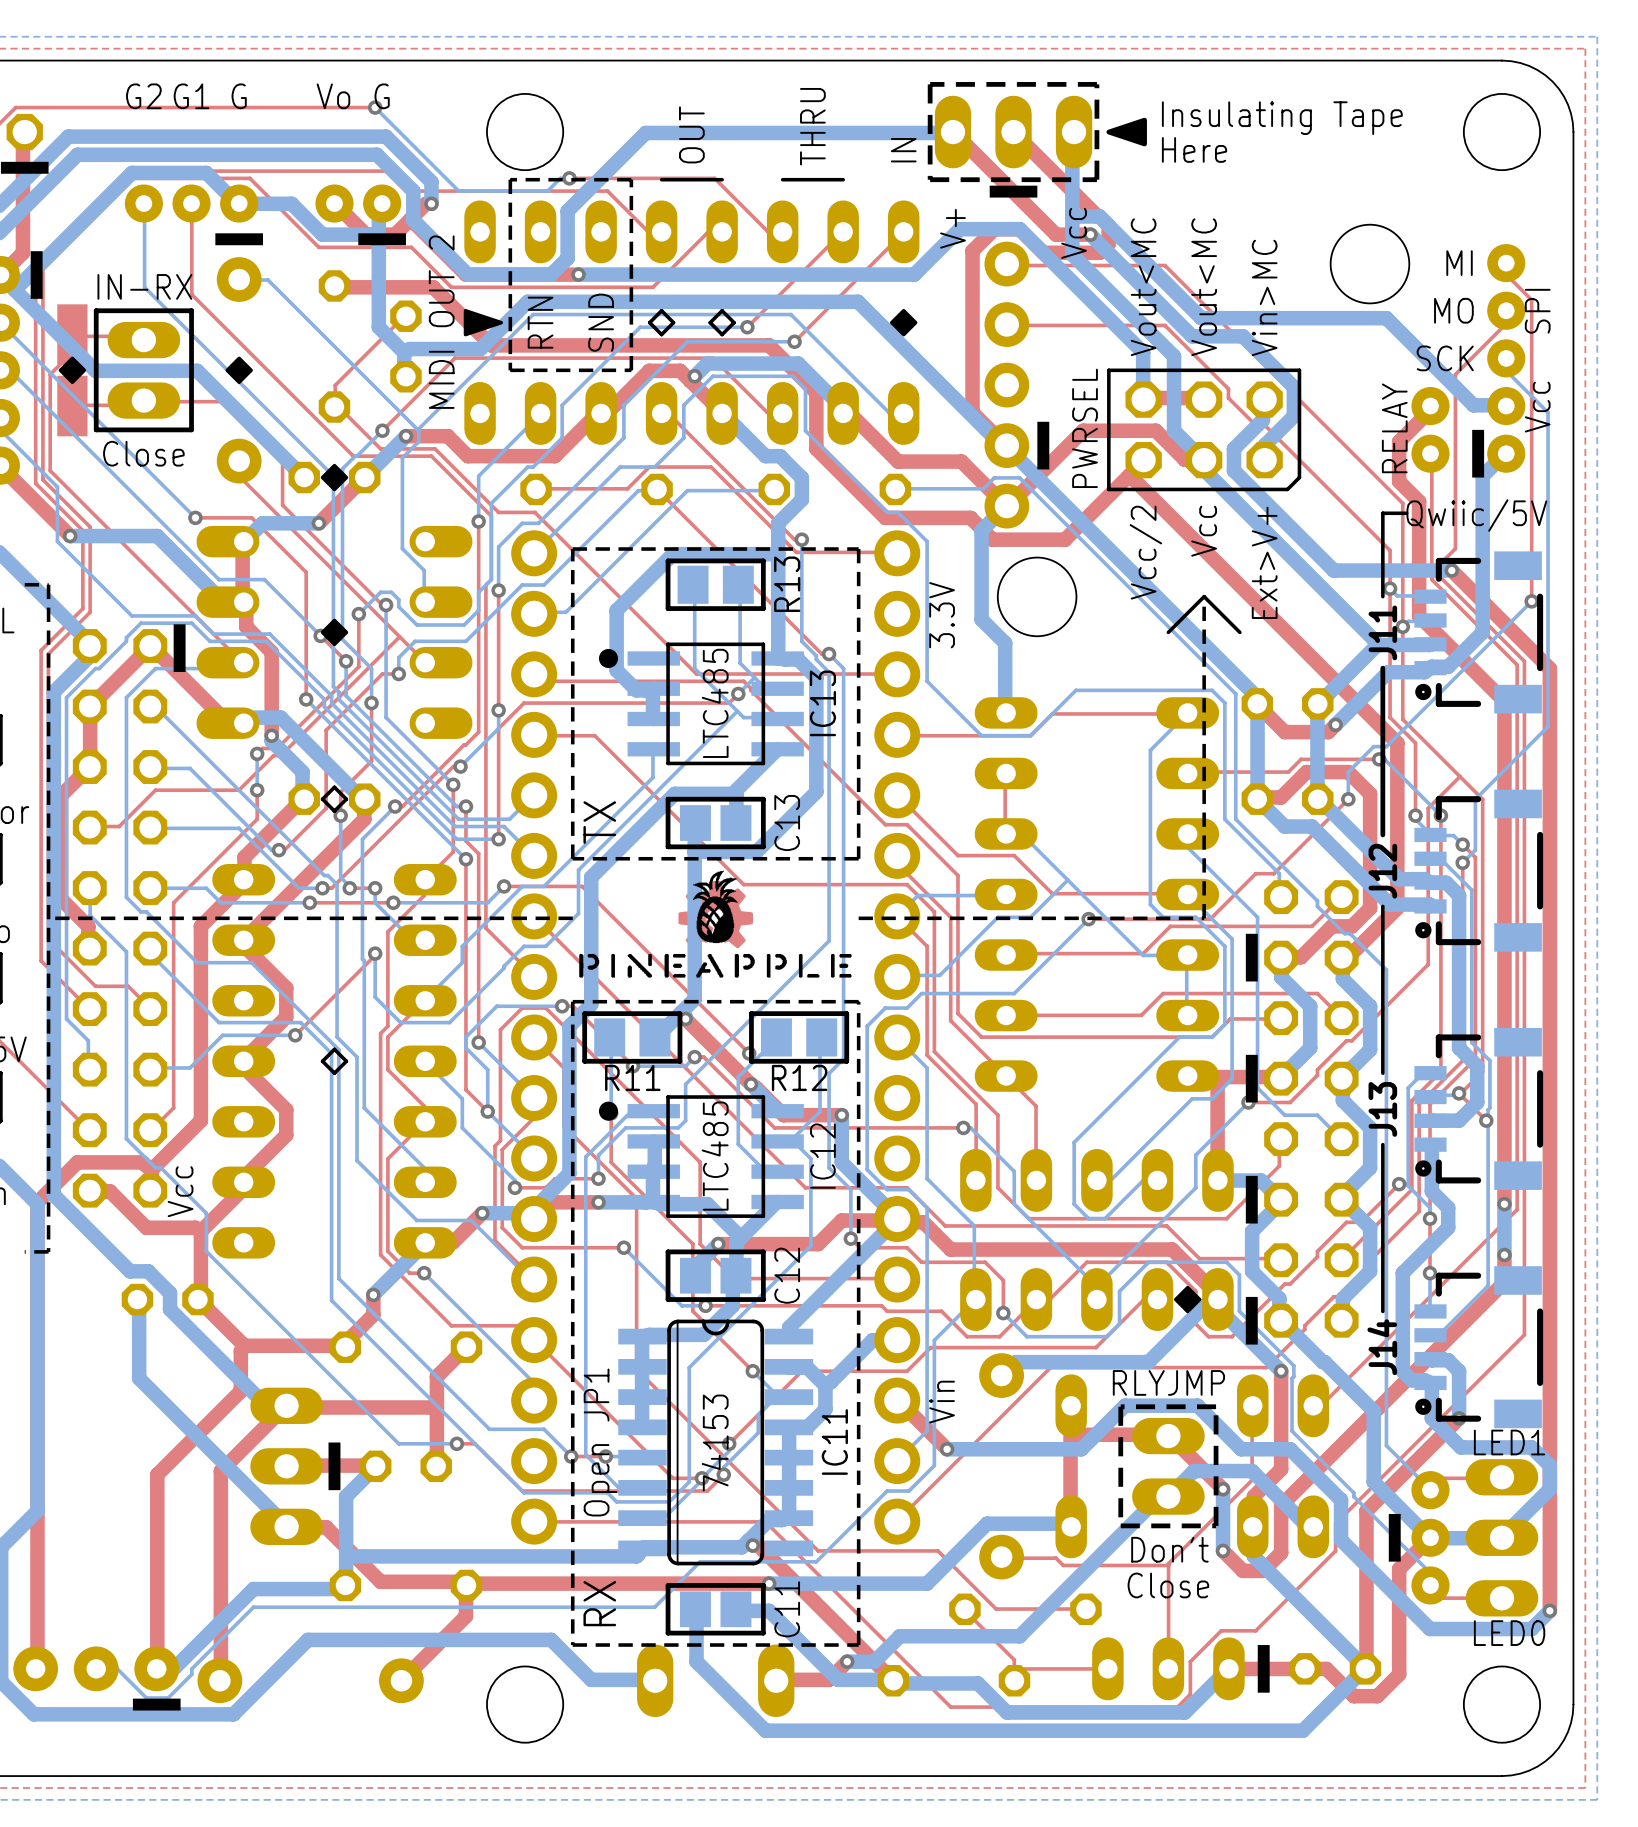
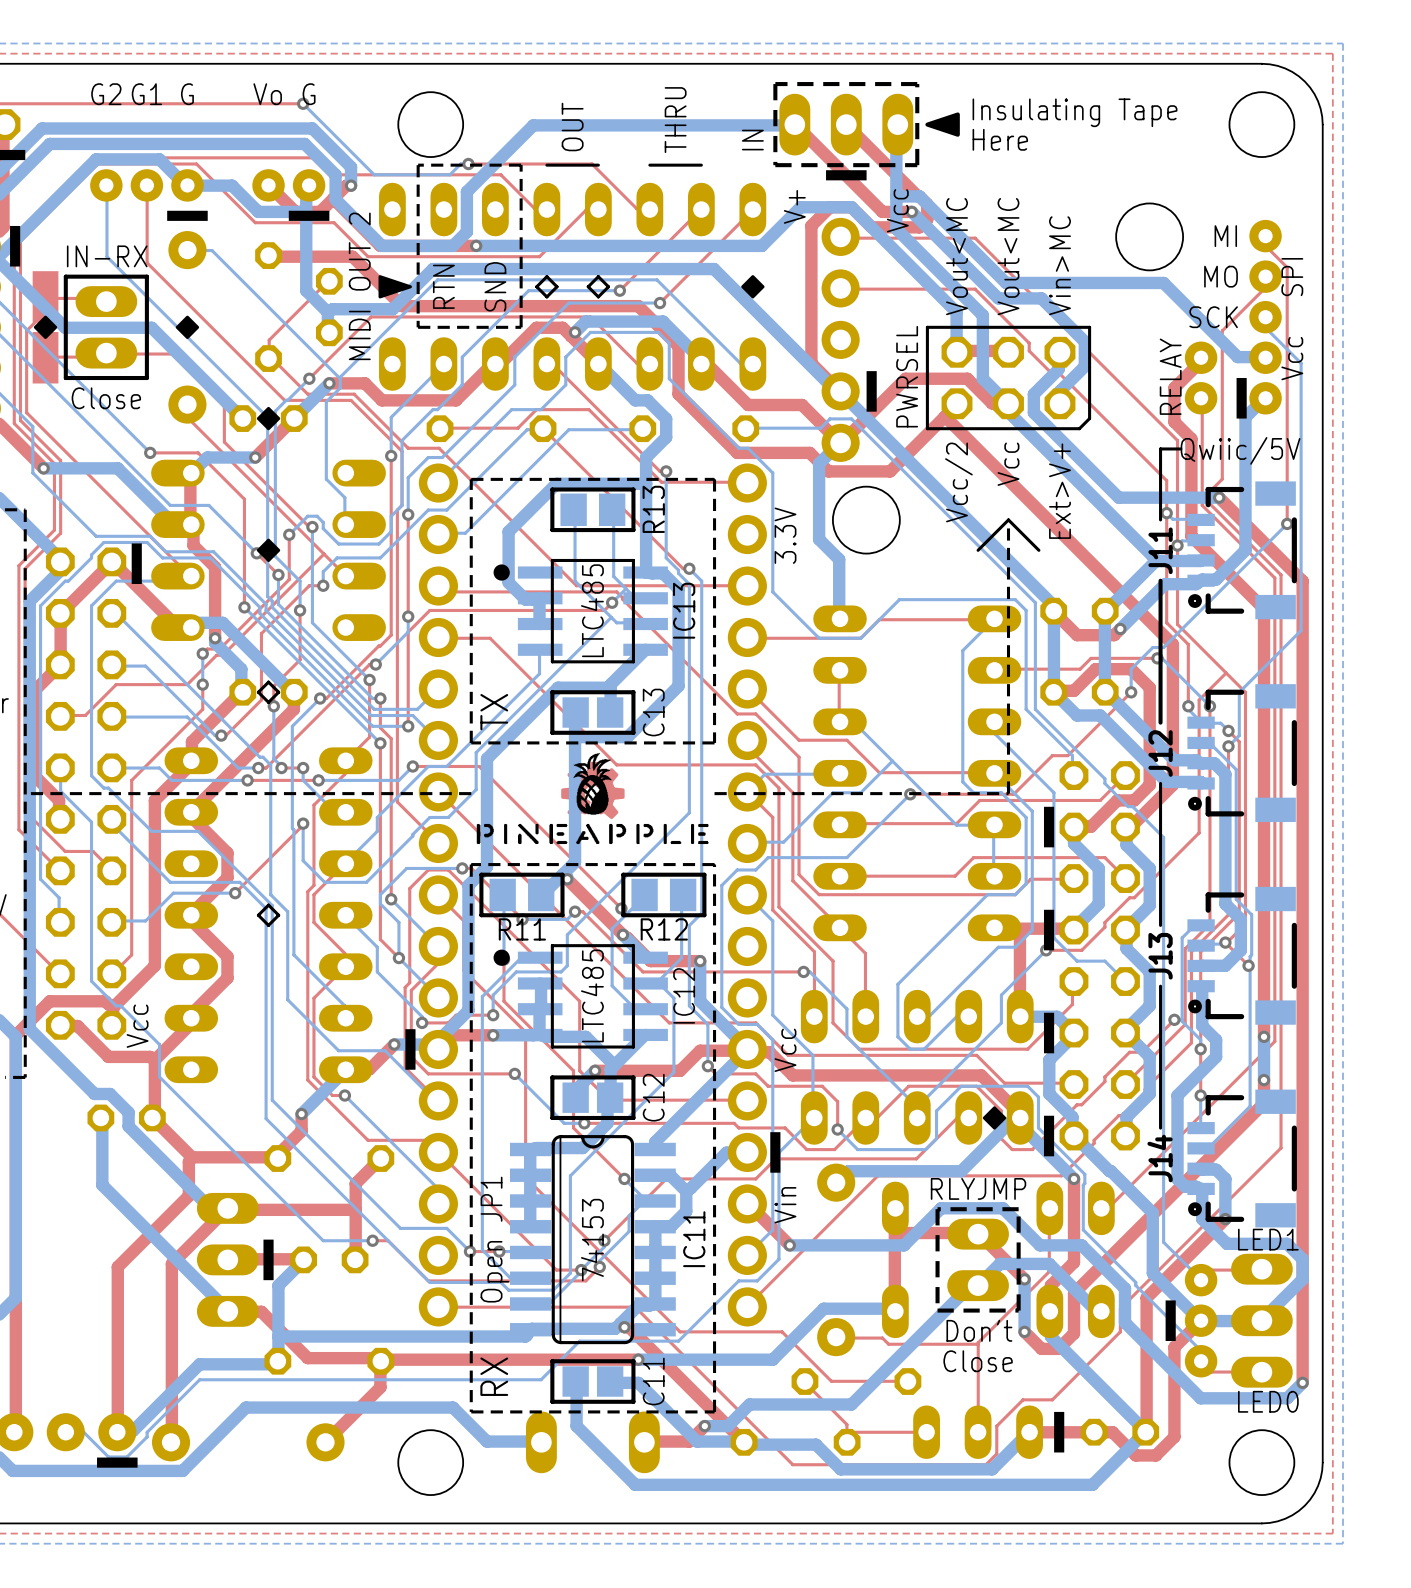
drawing: none -> [405, 1029, 416, 1070]
text: none -> Vcc (785, 1050)
drawing: none -> [770, 1132, 781, 1173]

